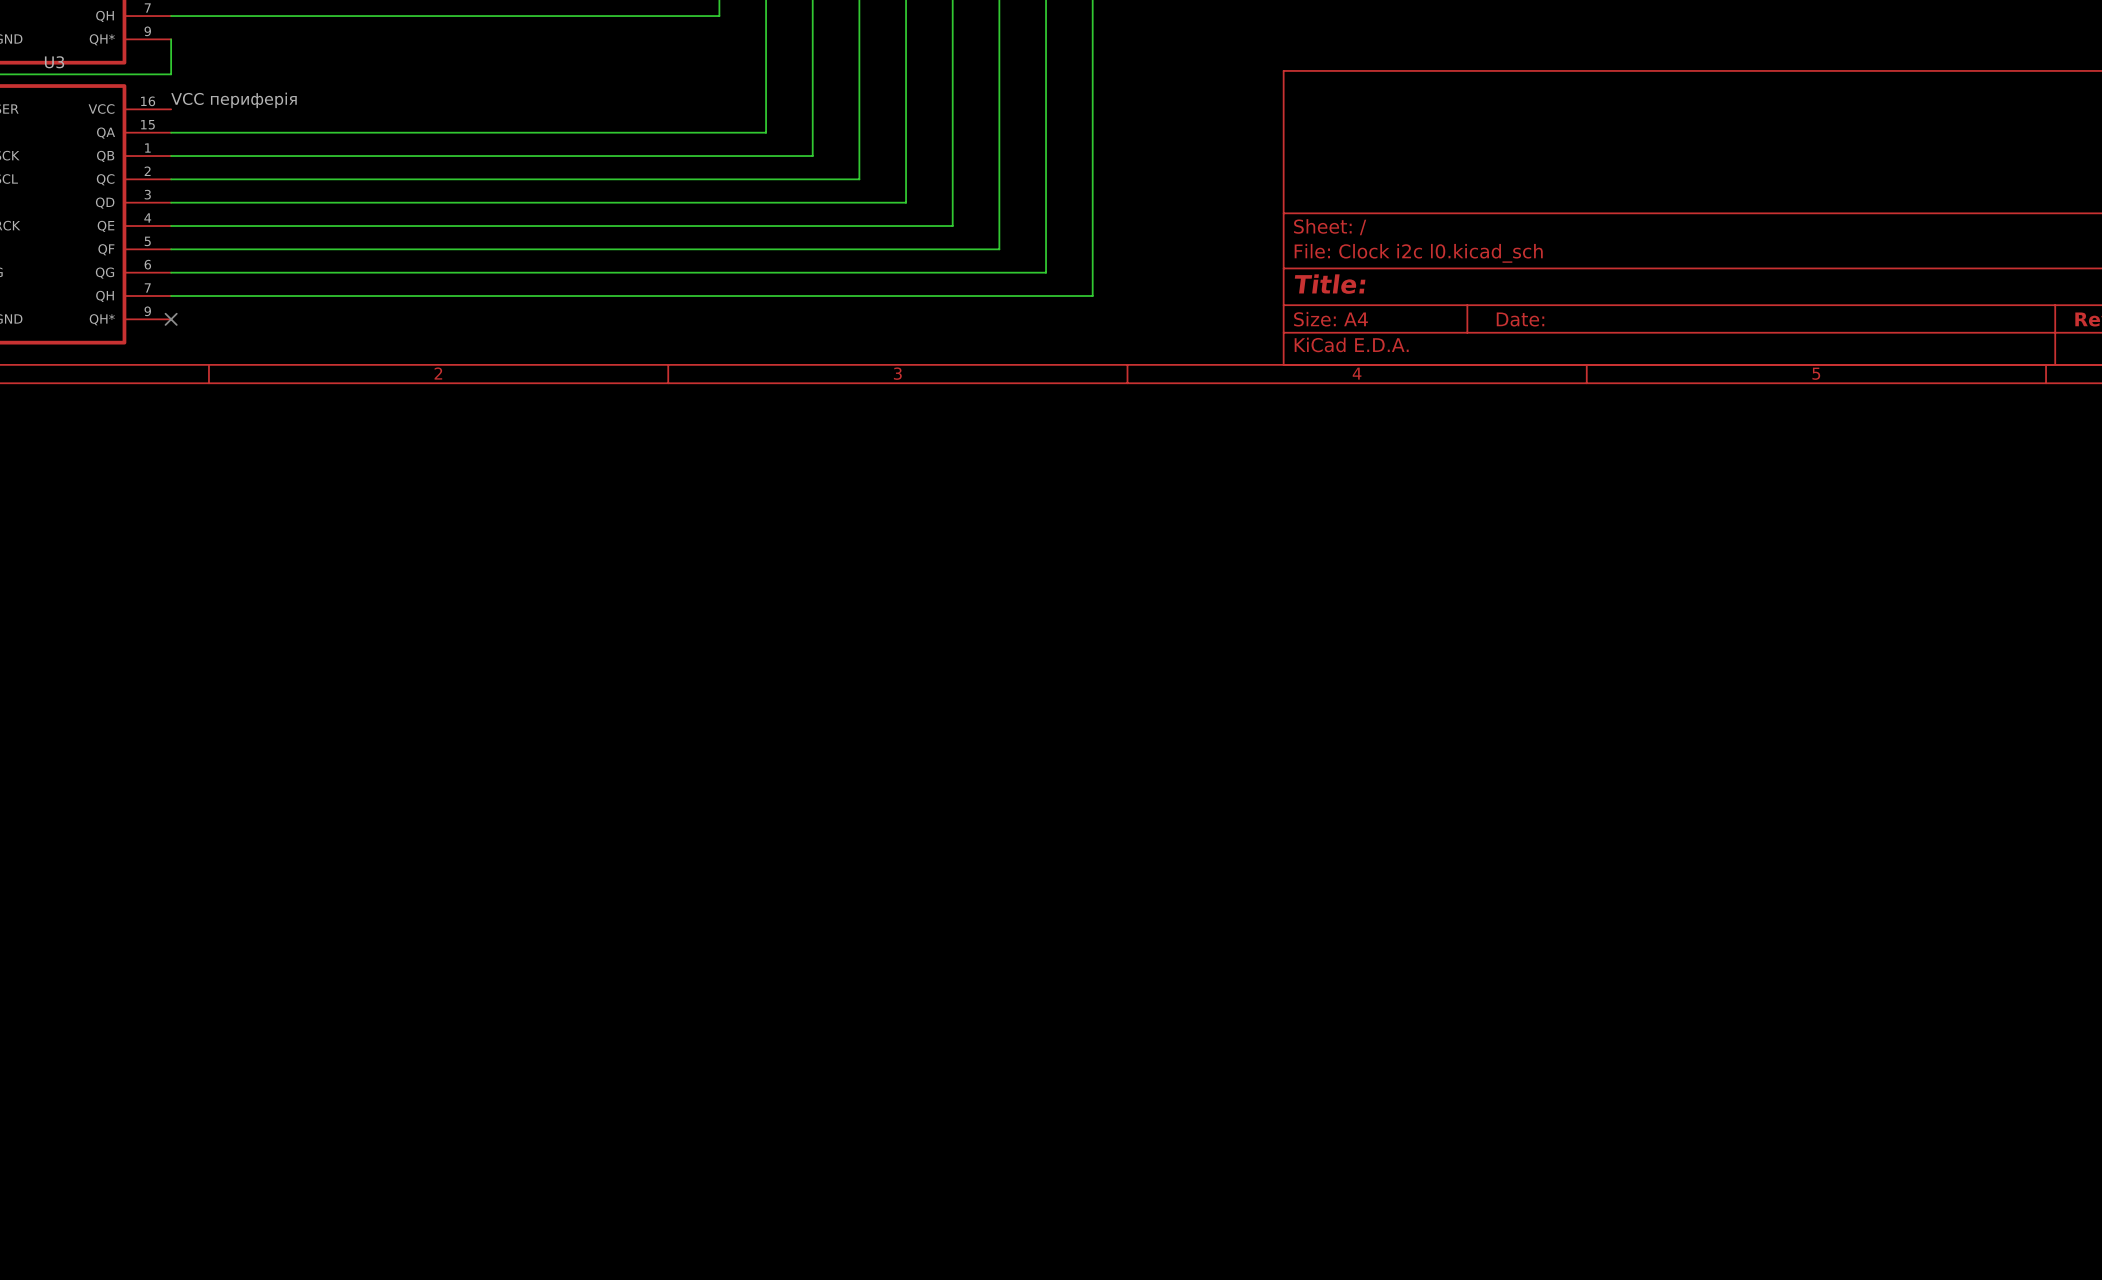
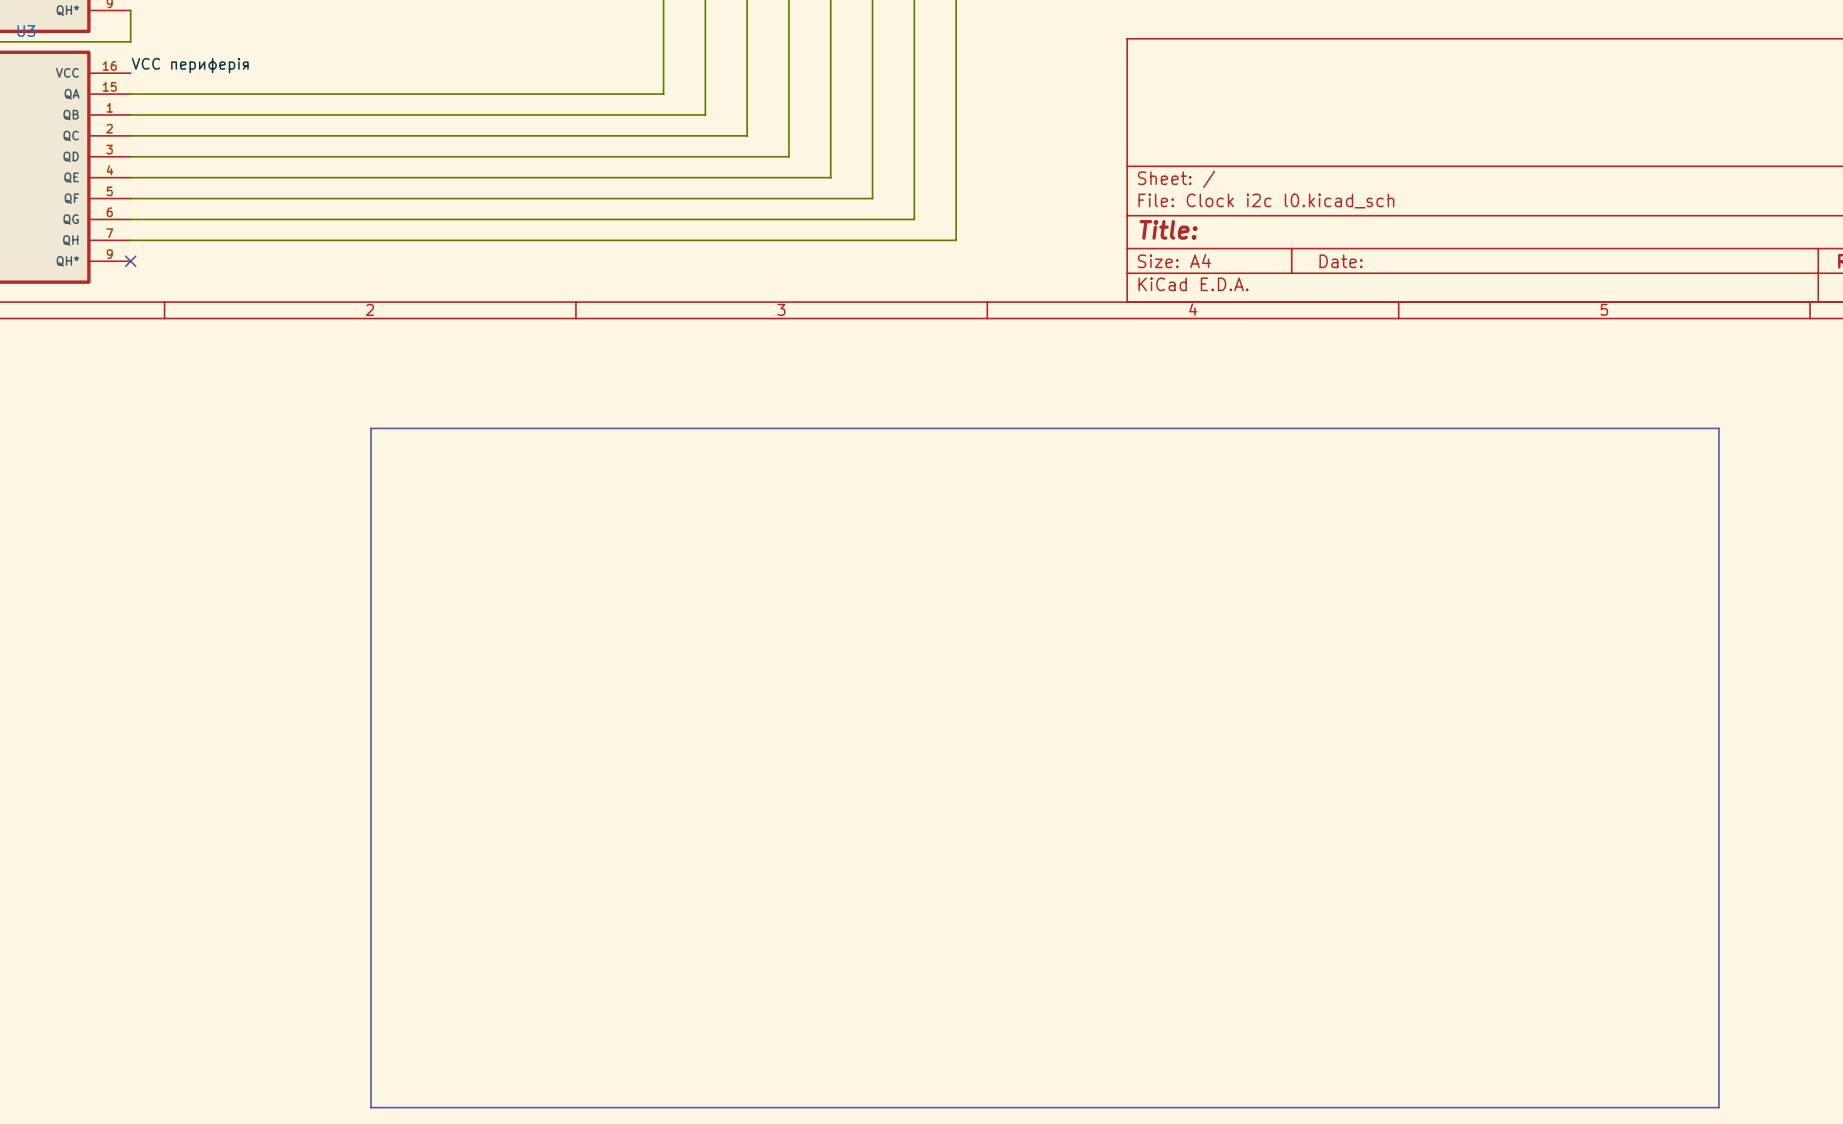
line: none -> (371, 428) (1718, 428) (1718, 1107) (371, 1107) (371, 428)

